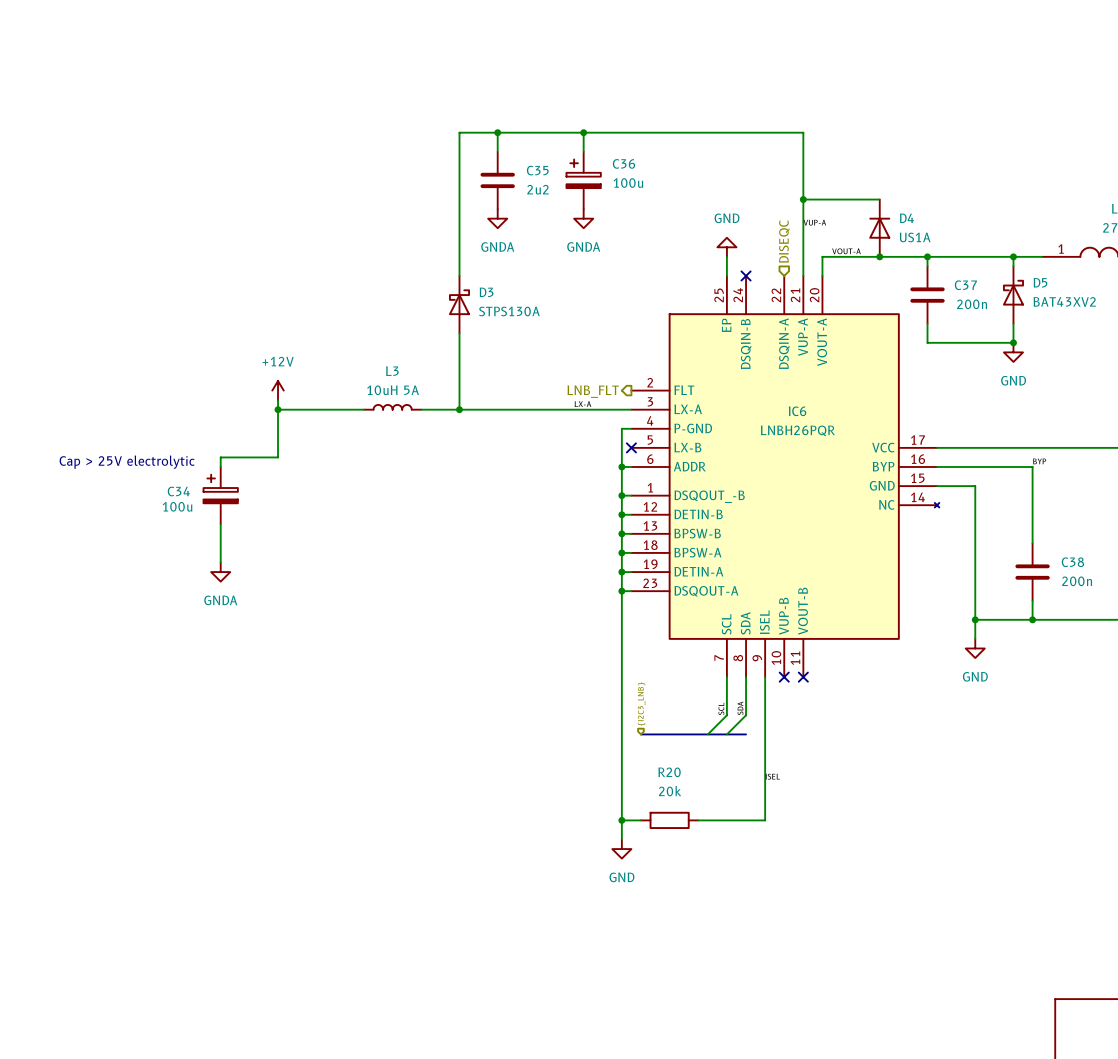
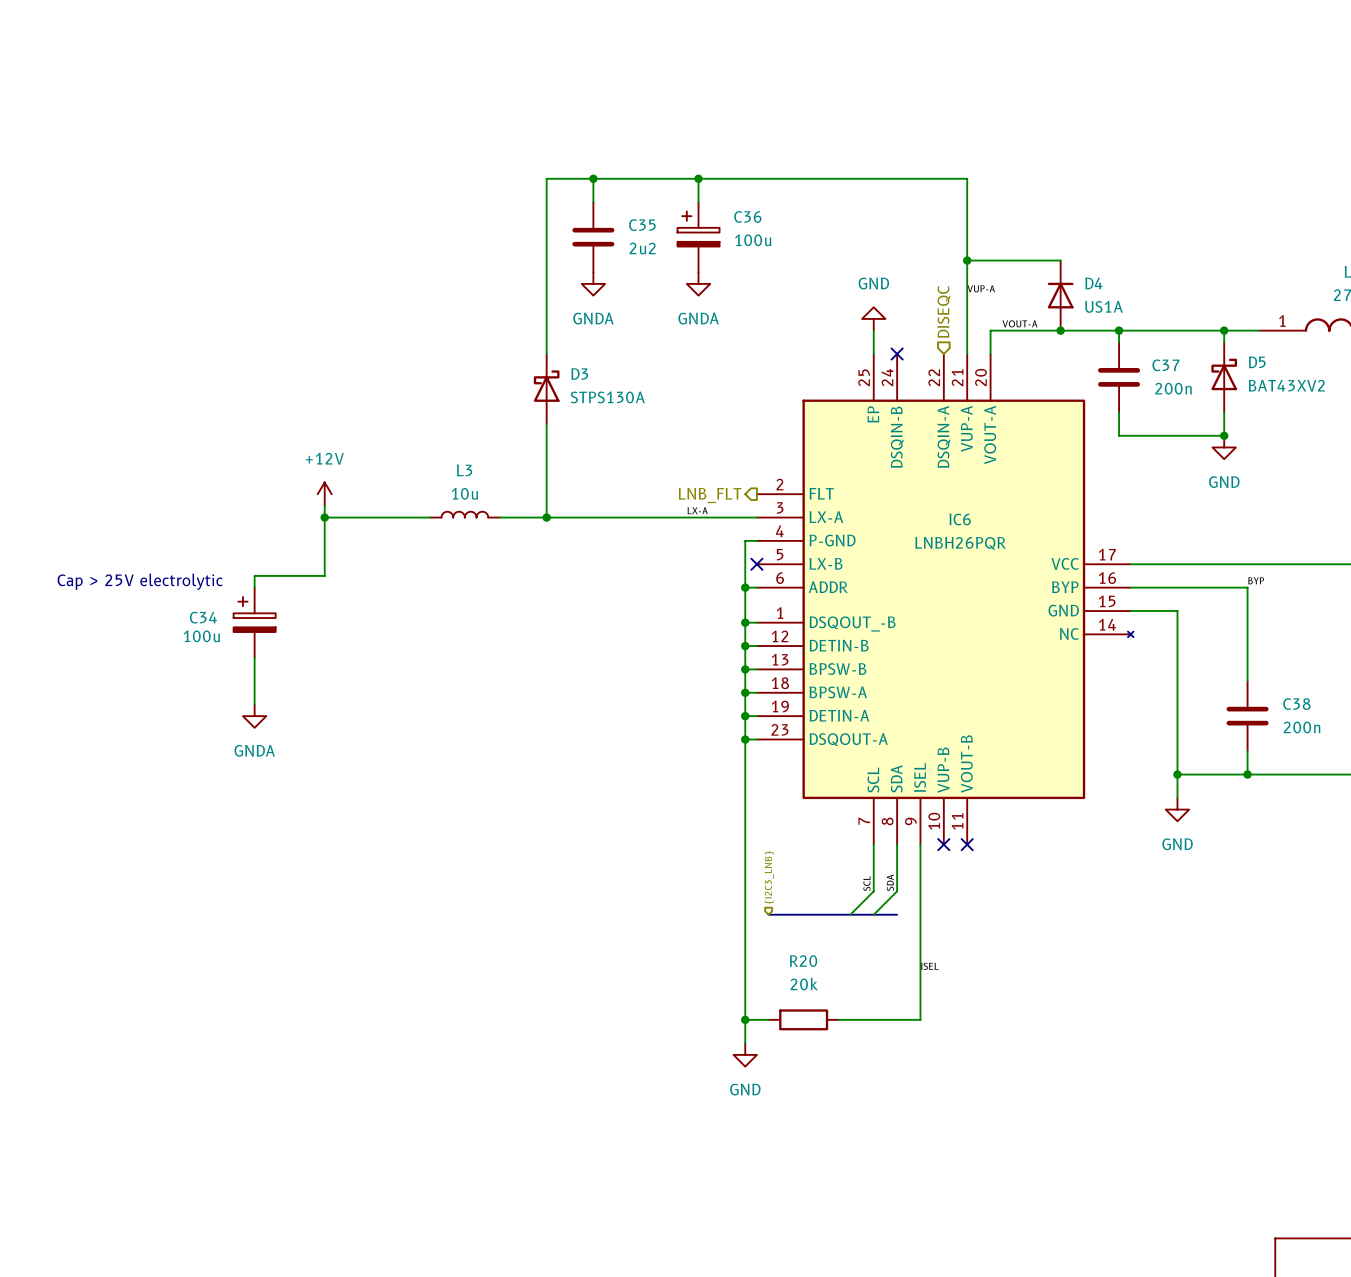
L3 value: 10uH 5A (393, 390) -> 10u (464, 493)

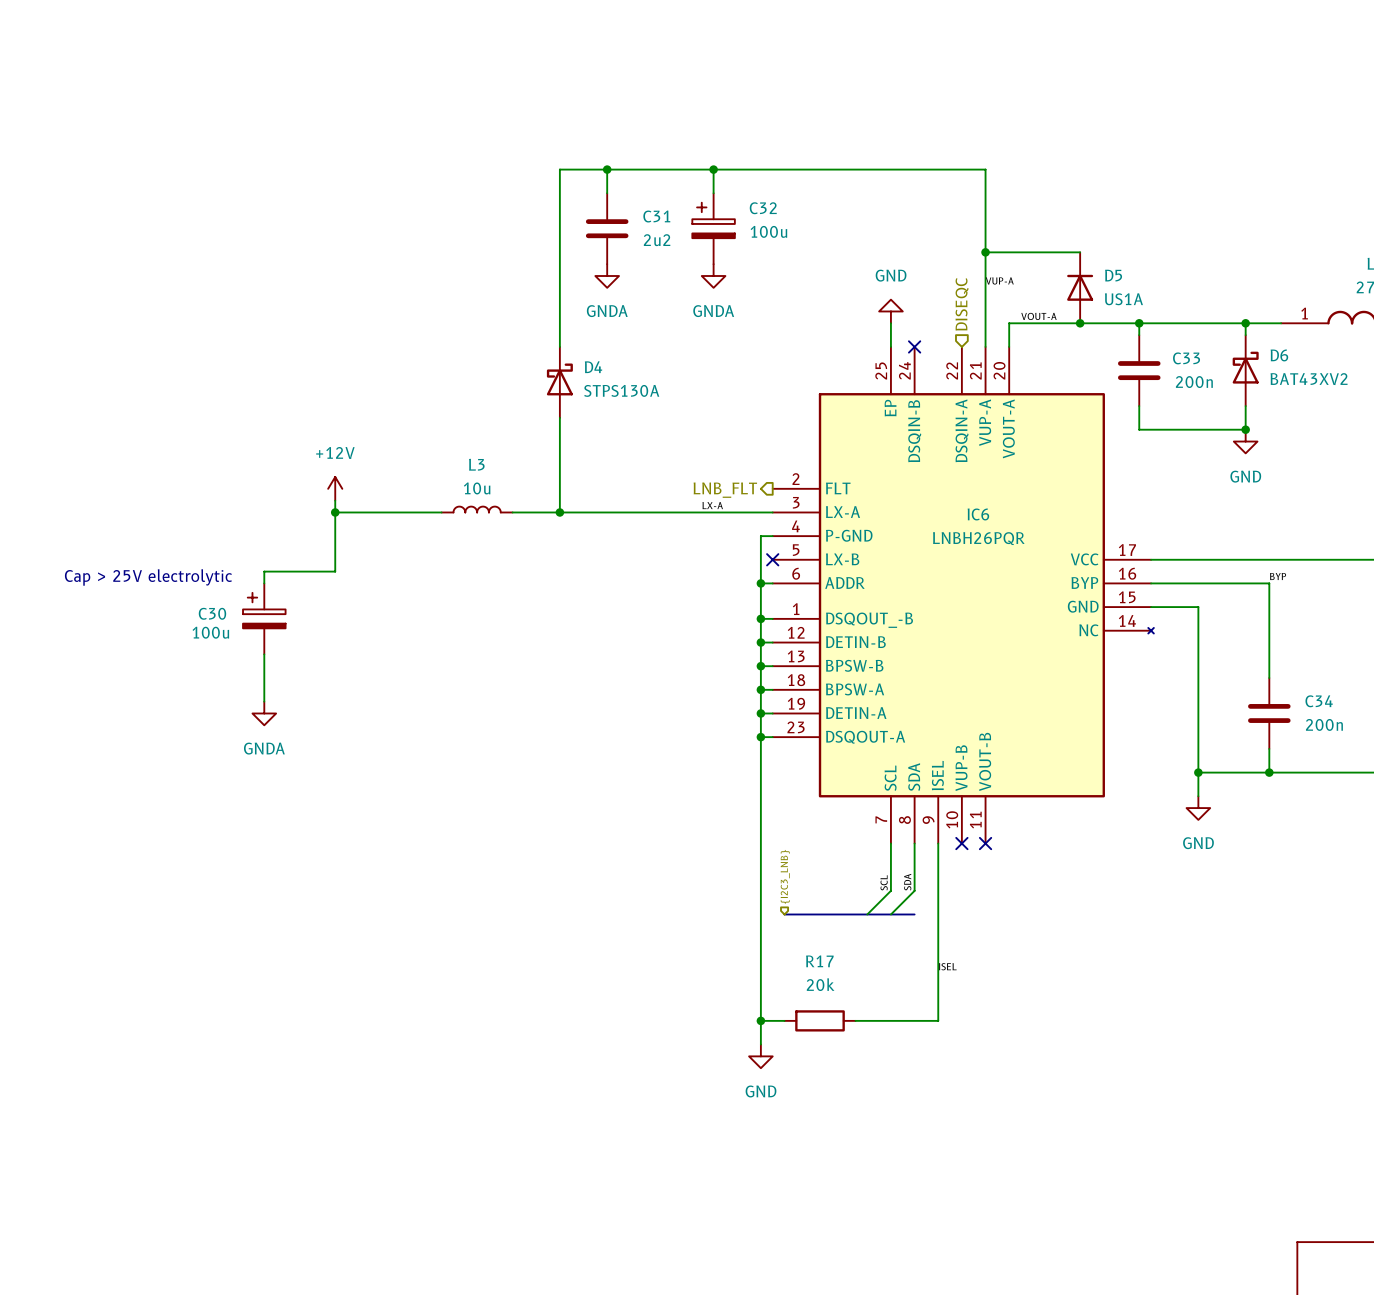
C36 name: C36 (747, 216) -> C32 (763, 208)
C35 name: C35 (642, 225) -> C31 (656, 216)
D4 name: D4 (1093, 283) -> D5 (1113, 275)
D5 name: D5 (1257, 362) -> D6 (1279, 355)
C37 name: C37 (1165, 365) -> C33 (1186, 358)
D3 name: D3 (579, 374) -> D4 (593, 367)
C34 name: C34 (203, 617) -> C30 (212, 613)
C38 name: C38 (1296, 704) -> C34 (1319, 701)
R20 name: R20 (803, 961) -> R17 (819, 961)

